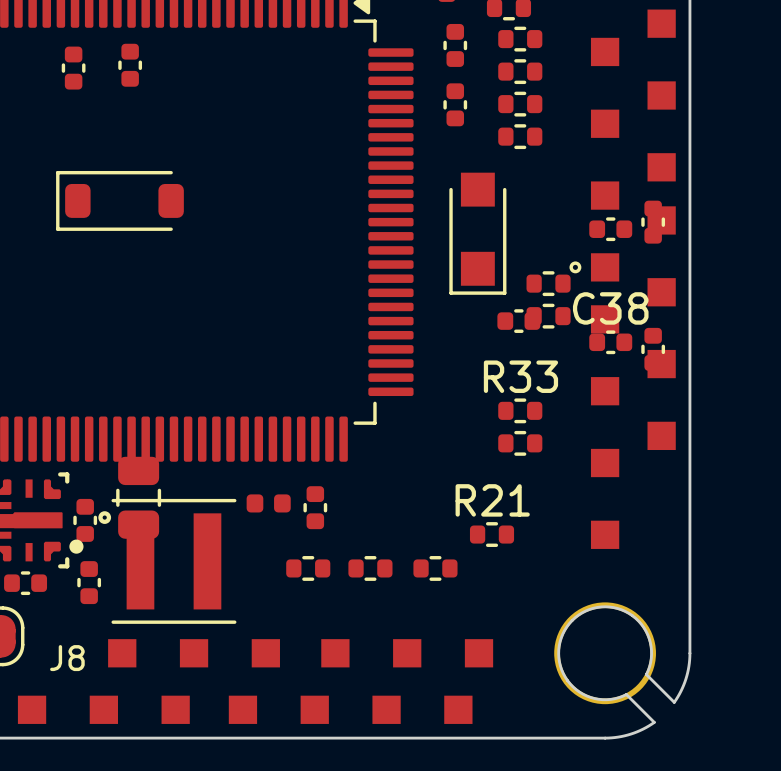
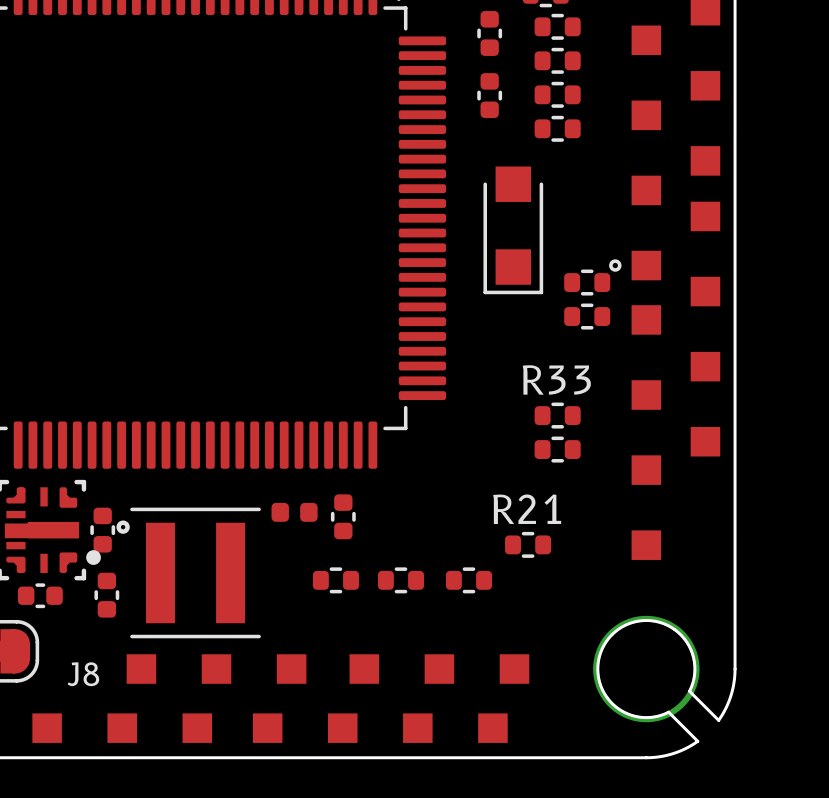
part: (130, 65) -> none
part: (73, 68) -> none
part: (119, 200) -> none
part: (653, 222) -> none
part: (610, 229) -> none
part: (518, 321) -> none
C38: (610, 342) -> none
part: (653, 349) -> none
part: (138, 497) -> none

